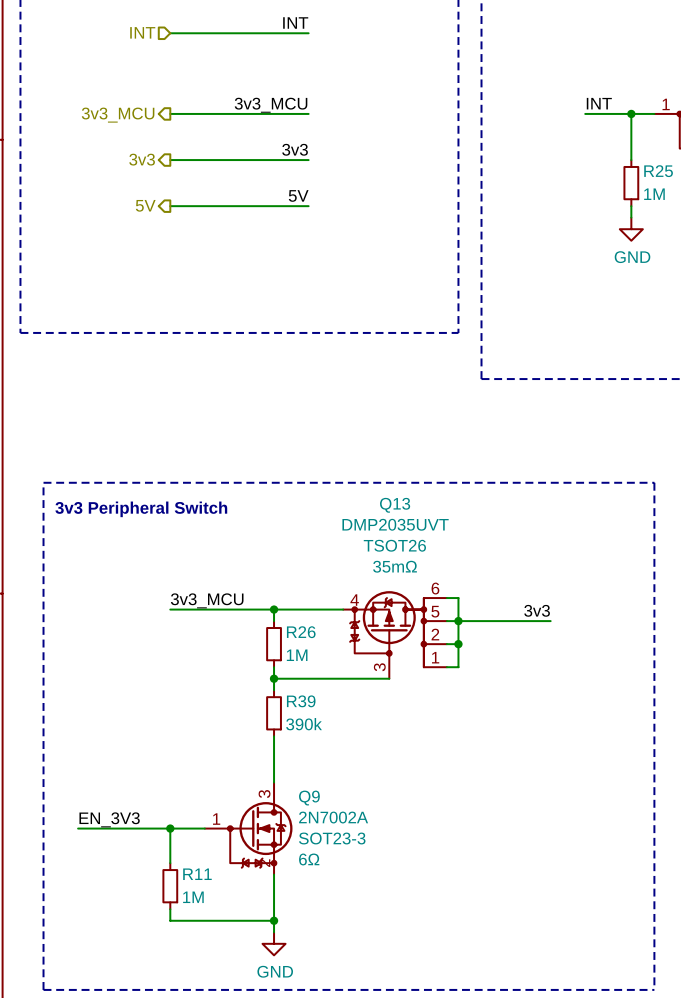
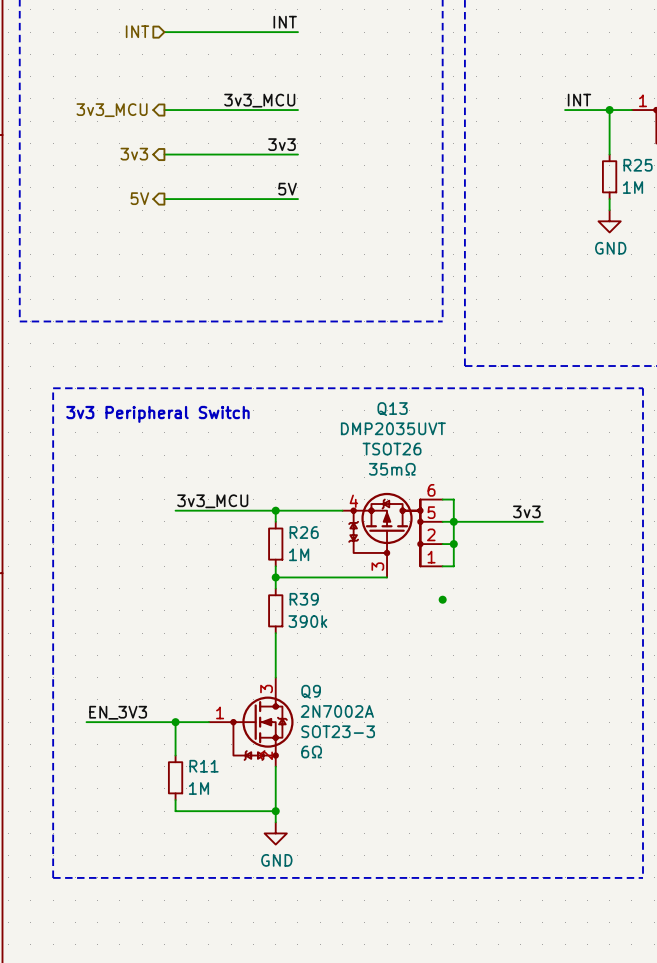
line: (43, 482) (43, 989) (654, 989) (654, 482) (43, 482) -> (53, 388) (53, 877) (643, 877) (643, 388) (53, 388)
text position: 3v3 Peripheral Switch (141, 509) -> 3v3 Peripheral Switch (157, 414)
junction: none -> (275, 510)
junction: none -> (453, 521)
junction: none -> (453, 544)
wire: (446, 598) (458, 598) (458, 667) (446, 667) -> (442, 499) (453, 499) (453, 566) (442, 566)
label position: 3v3_MCU (207, 600) -> 3v3_MCU (212, 501)
wire: (170, 609) (343, 609) -> (175, 510) (342, 510)
wire: (274, 609) (274, 621) -> (275, 510) (275, 521)
junction position: (274, 609) -> (275, 577)
label position: 3v3 (537, 610) -> 3v3 (526, 511)
wire: (446, 621) (550, 621) -> (442, 521) (542, 521)
Q13 position: (395, 634) -> (392, 535)
R26 position: (274, 644) -> (275, 544)
wire: (446, 644) (458, 644) -> (442, 544) (453, 544)
junction: (458, 644) -> none
wire: (274, 667) (274, 690) -> (275, 566) (275, 588)
wire: (274, 678) (389, 678) -> (275, 577) (387, 577)
junction: (274, 678) -> none
R39 position: (274, 713) -> (275, 610)
wire: (274, 736) (274, 782) -> (275, 633) (275, 677)
junction: none -> (175, 722)
label position: EN_3V3 (109, 819) -> EN_3V3 (118, 712)
wire: (78, 828) (204, 828) -> (86, 722) (208, 722)
wire: (170, 828) (170, 863) -> (175, 722) (175, 755)
junction: (170, 828) -> none
Q9 position: (248, 828) -> (251, 722)
junction: none -> (275, 811)
wire: (274, 874) (274, 932) -> (275, 766) (275, 822)
R11 position: (170, 886) -> (175, 777)
wire: (170, 909) (170, 920) (274, 920) -> (175, 800) (175, 811) (275, 811)
junction: (274, 920) -> none
power symbol position: GND (274, 943) -> GND (275, 833)

